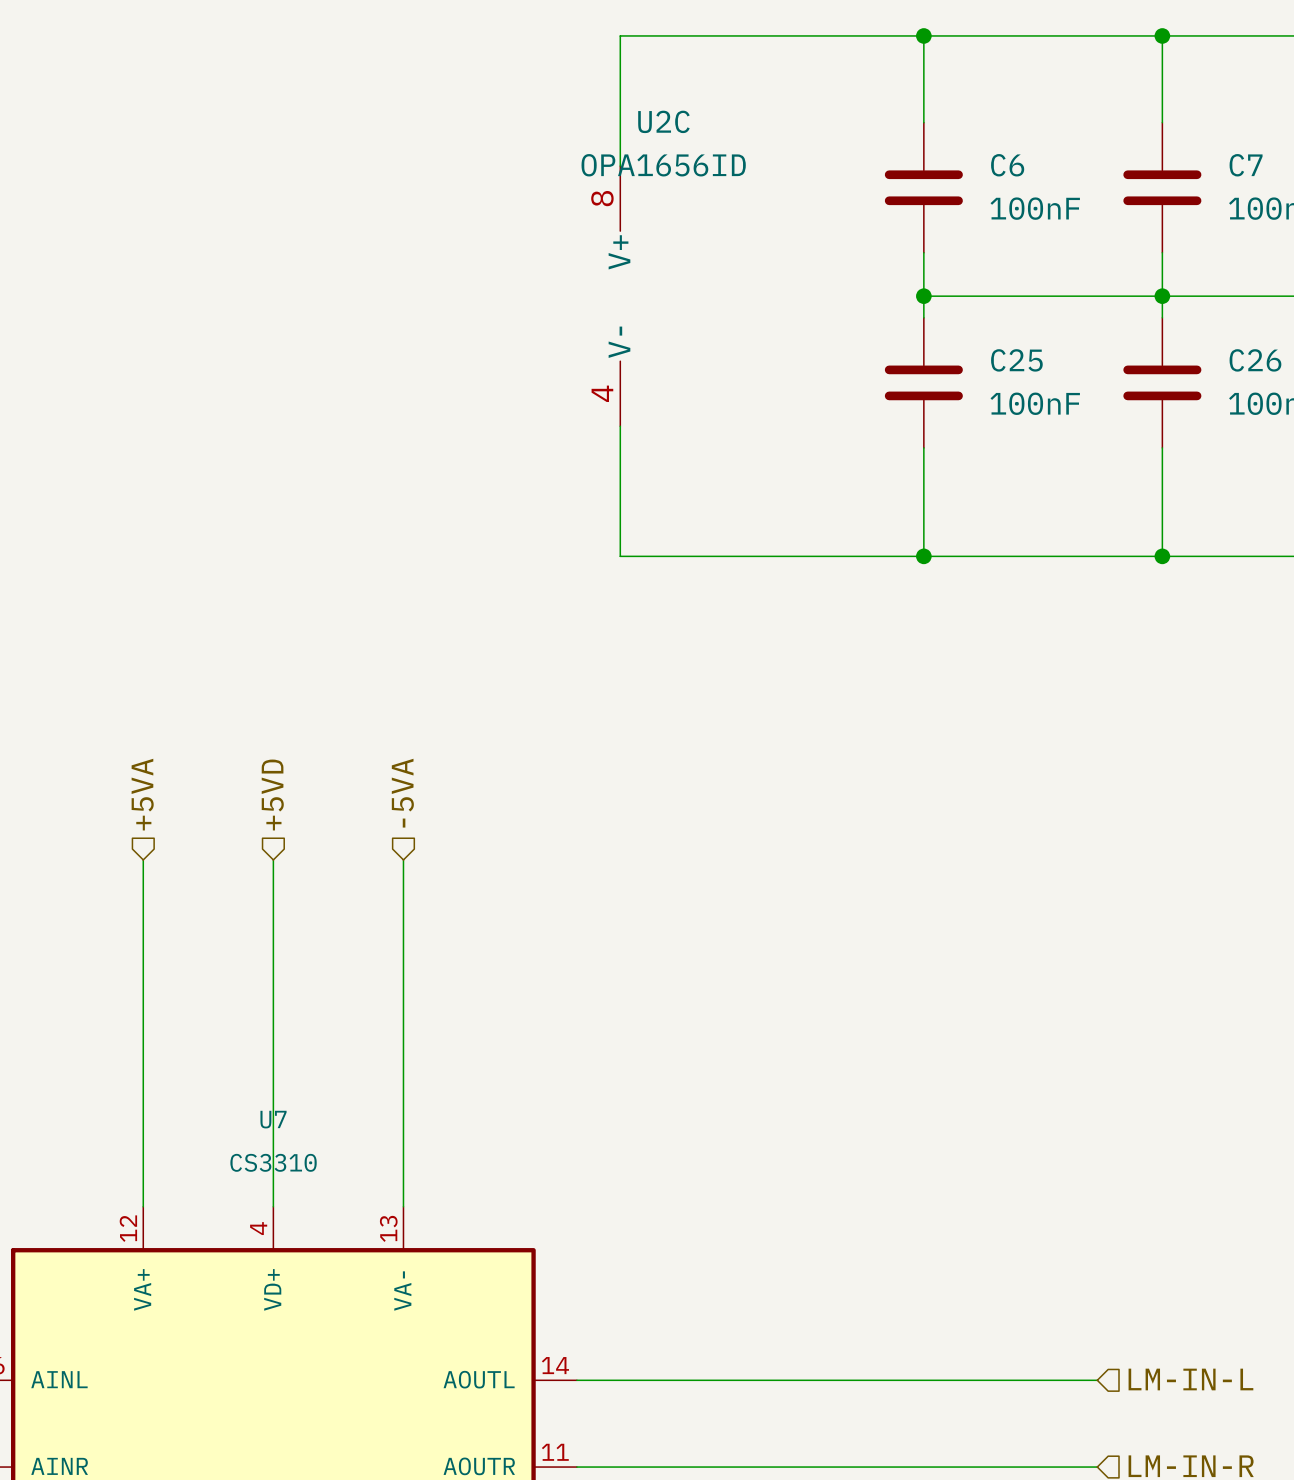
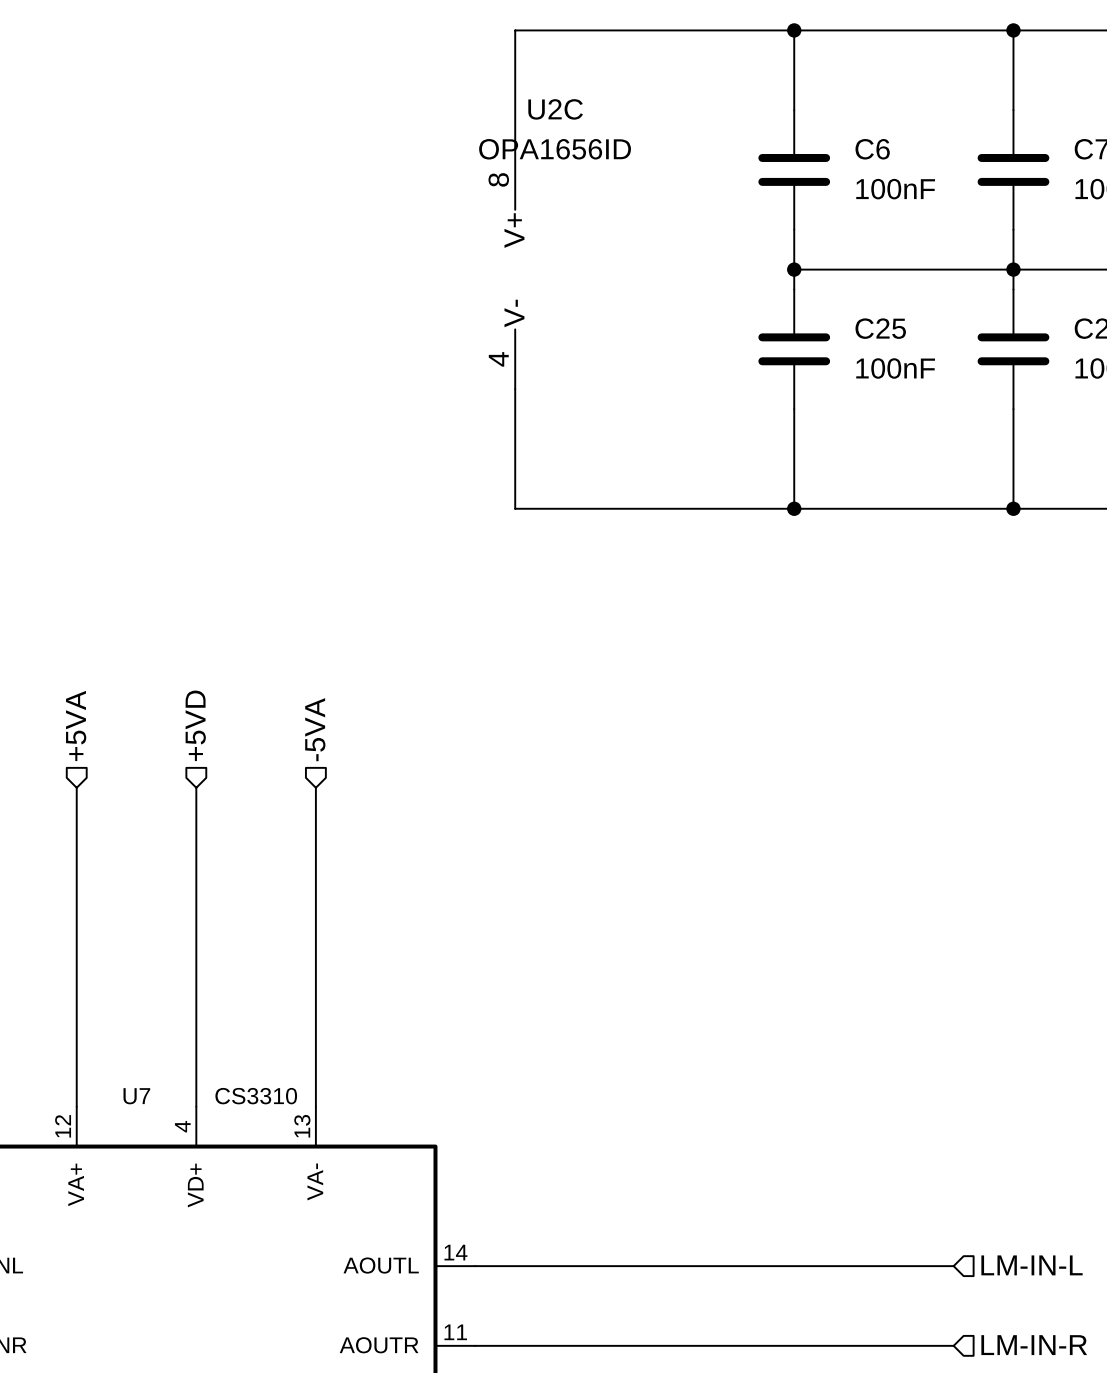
U7 name position: U7 (273, 1119) -> U7 (136, 1096)
U7 value position: CS3310 (273, 1162) -> CS3310 (256, 1096)

